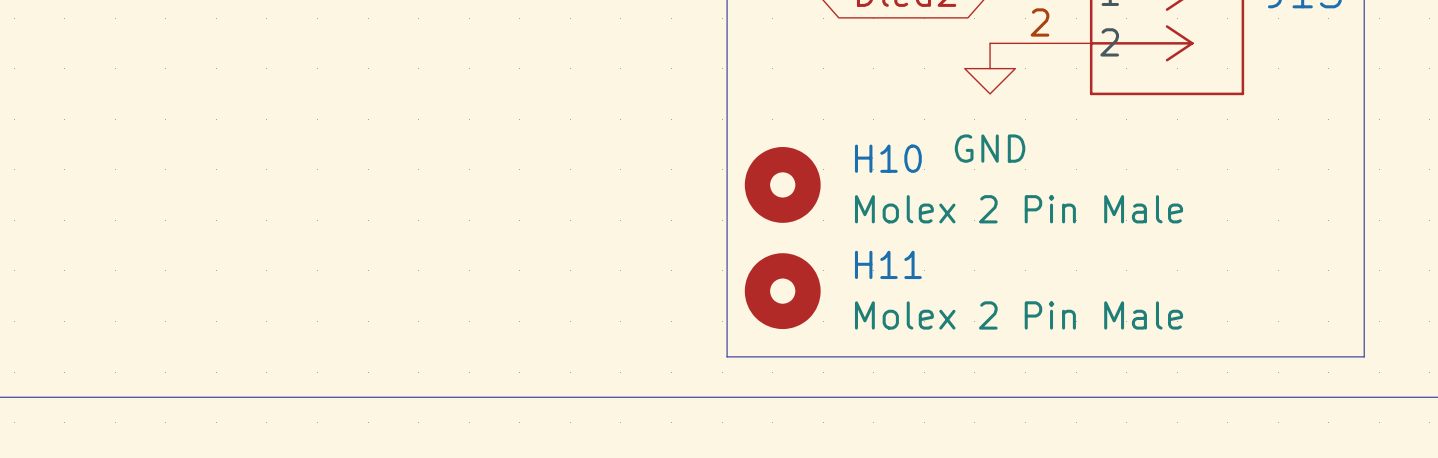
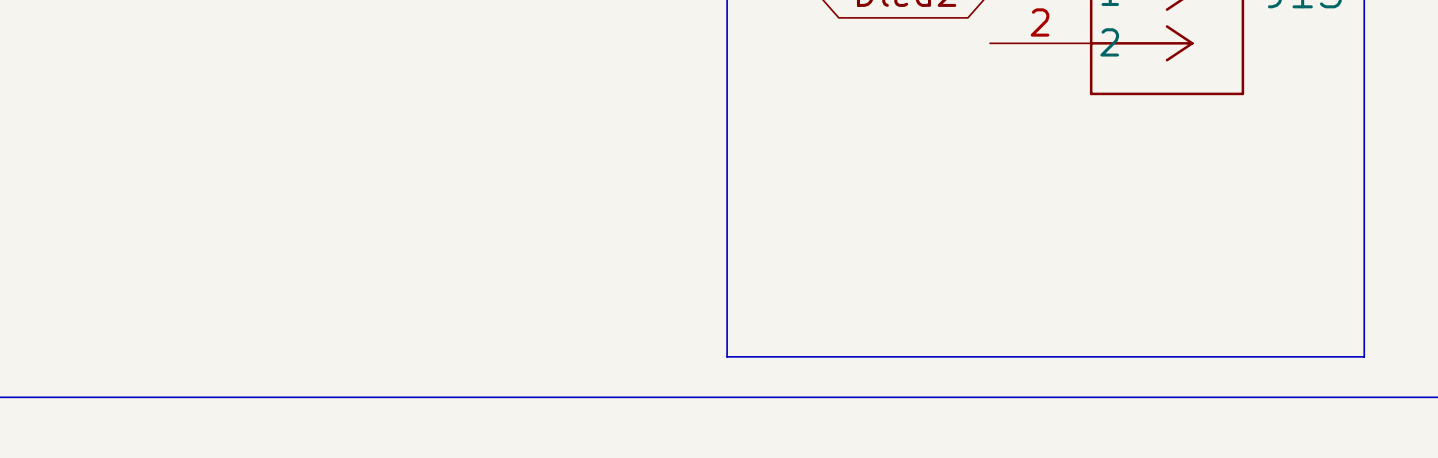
power symbol: GND (990, 68) -> none
H10: Molex 2 Pin Male (782, 184) -> none
H11: Molex 2 Pin Male (782, 291) -> none

